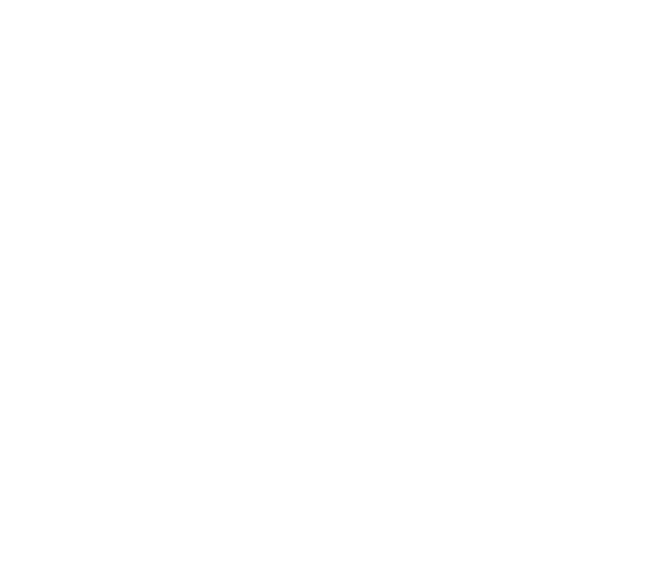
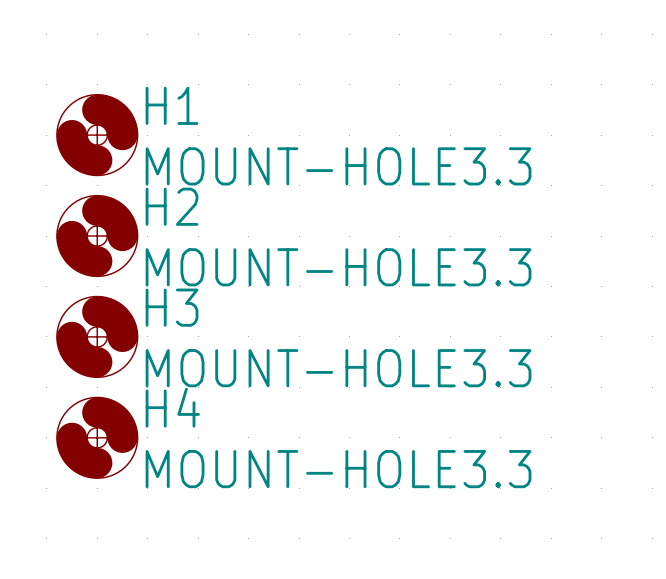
H1: none -> MOUNT-HOLE3.3 (97, 135)
H2: none -> MOUNT-HOLE3.3 (97, 236)
H3: none -> MOUNT-HOLE3.3 (97, 336)
H4: none -> MOUNT-HOLE3.3 (97, 437)

